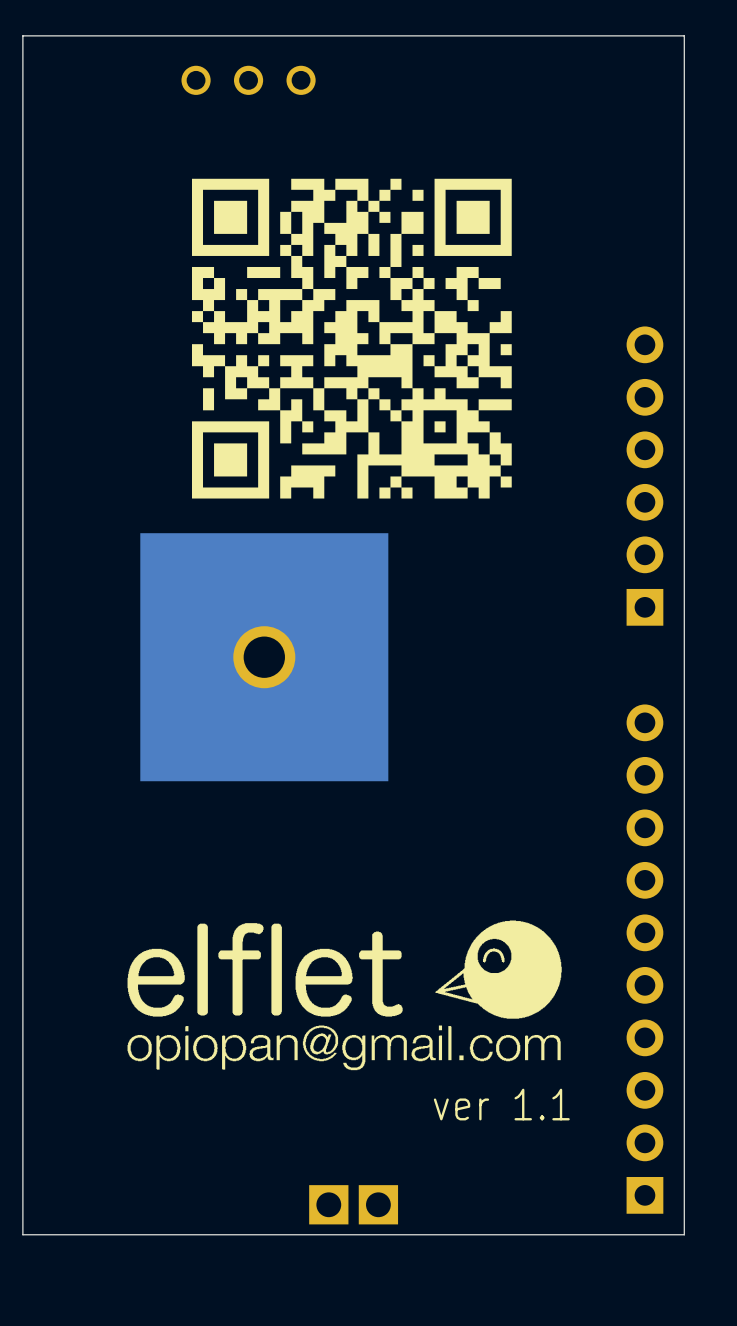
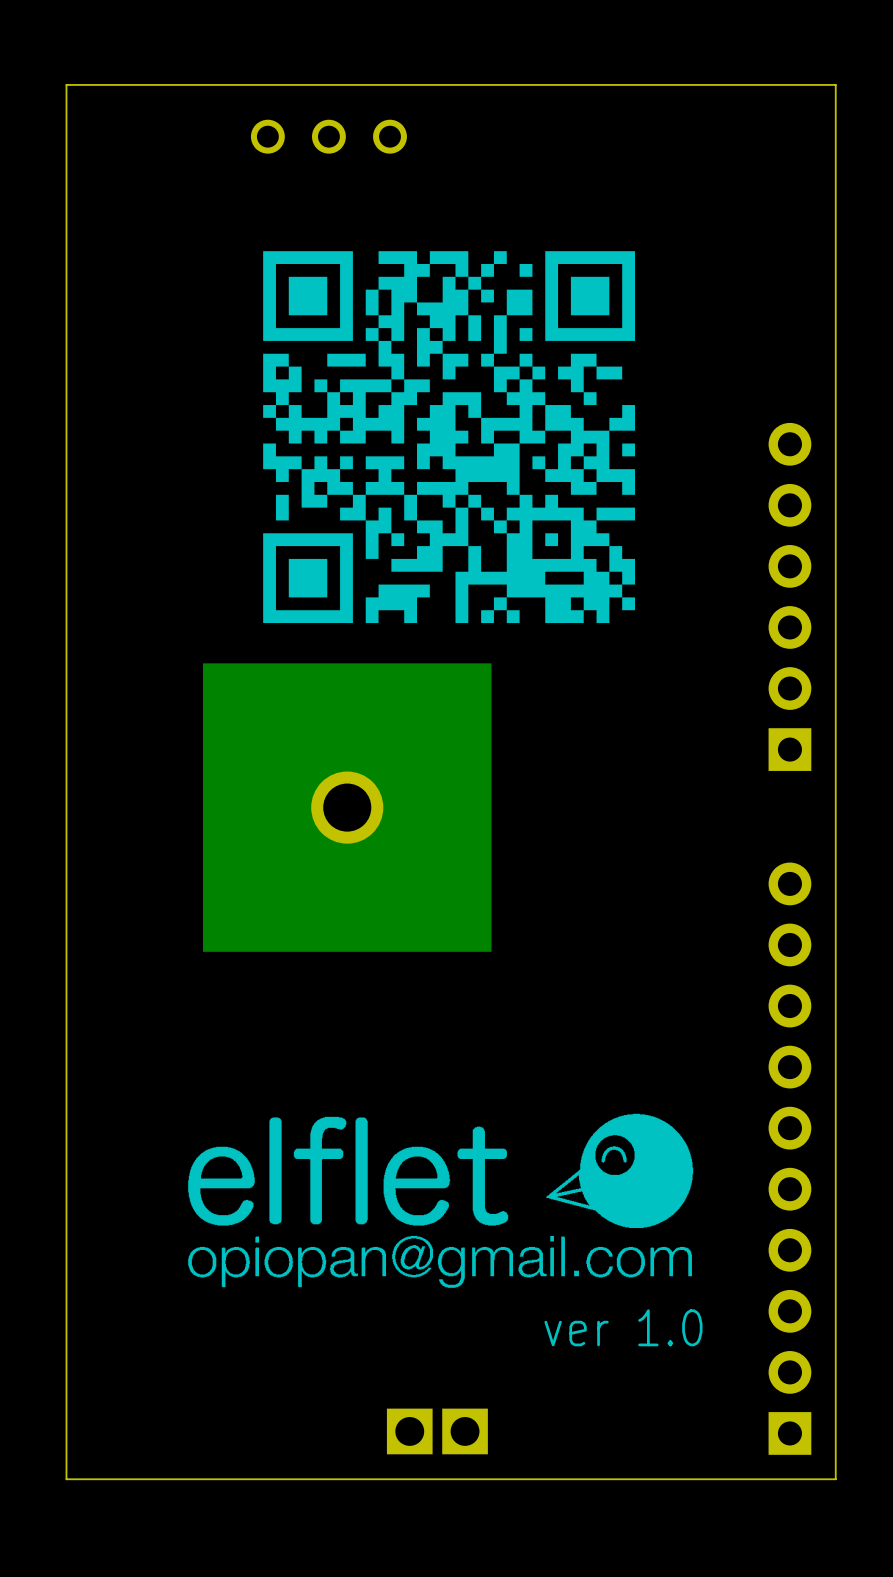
text: ver 1.1 (501, 1104) -> ver 1.0 (623, 1327)
part footprint: [309, 1185, 399, 1225] -> [386, 1408, 488, 1455]

